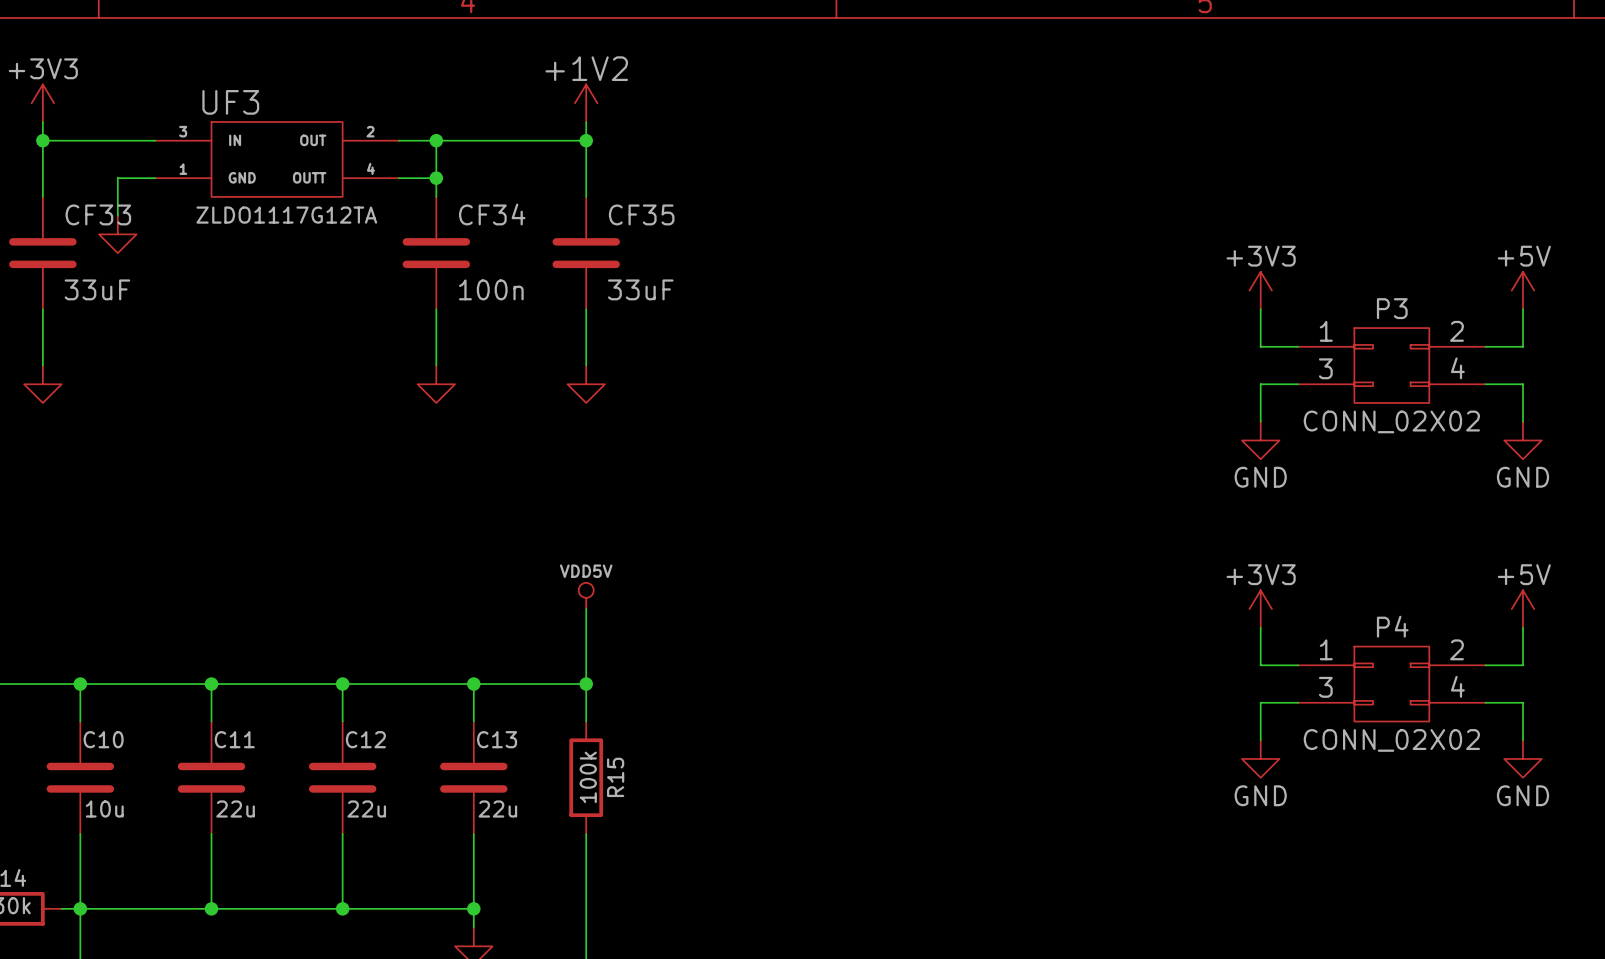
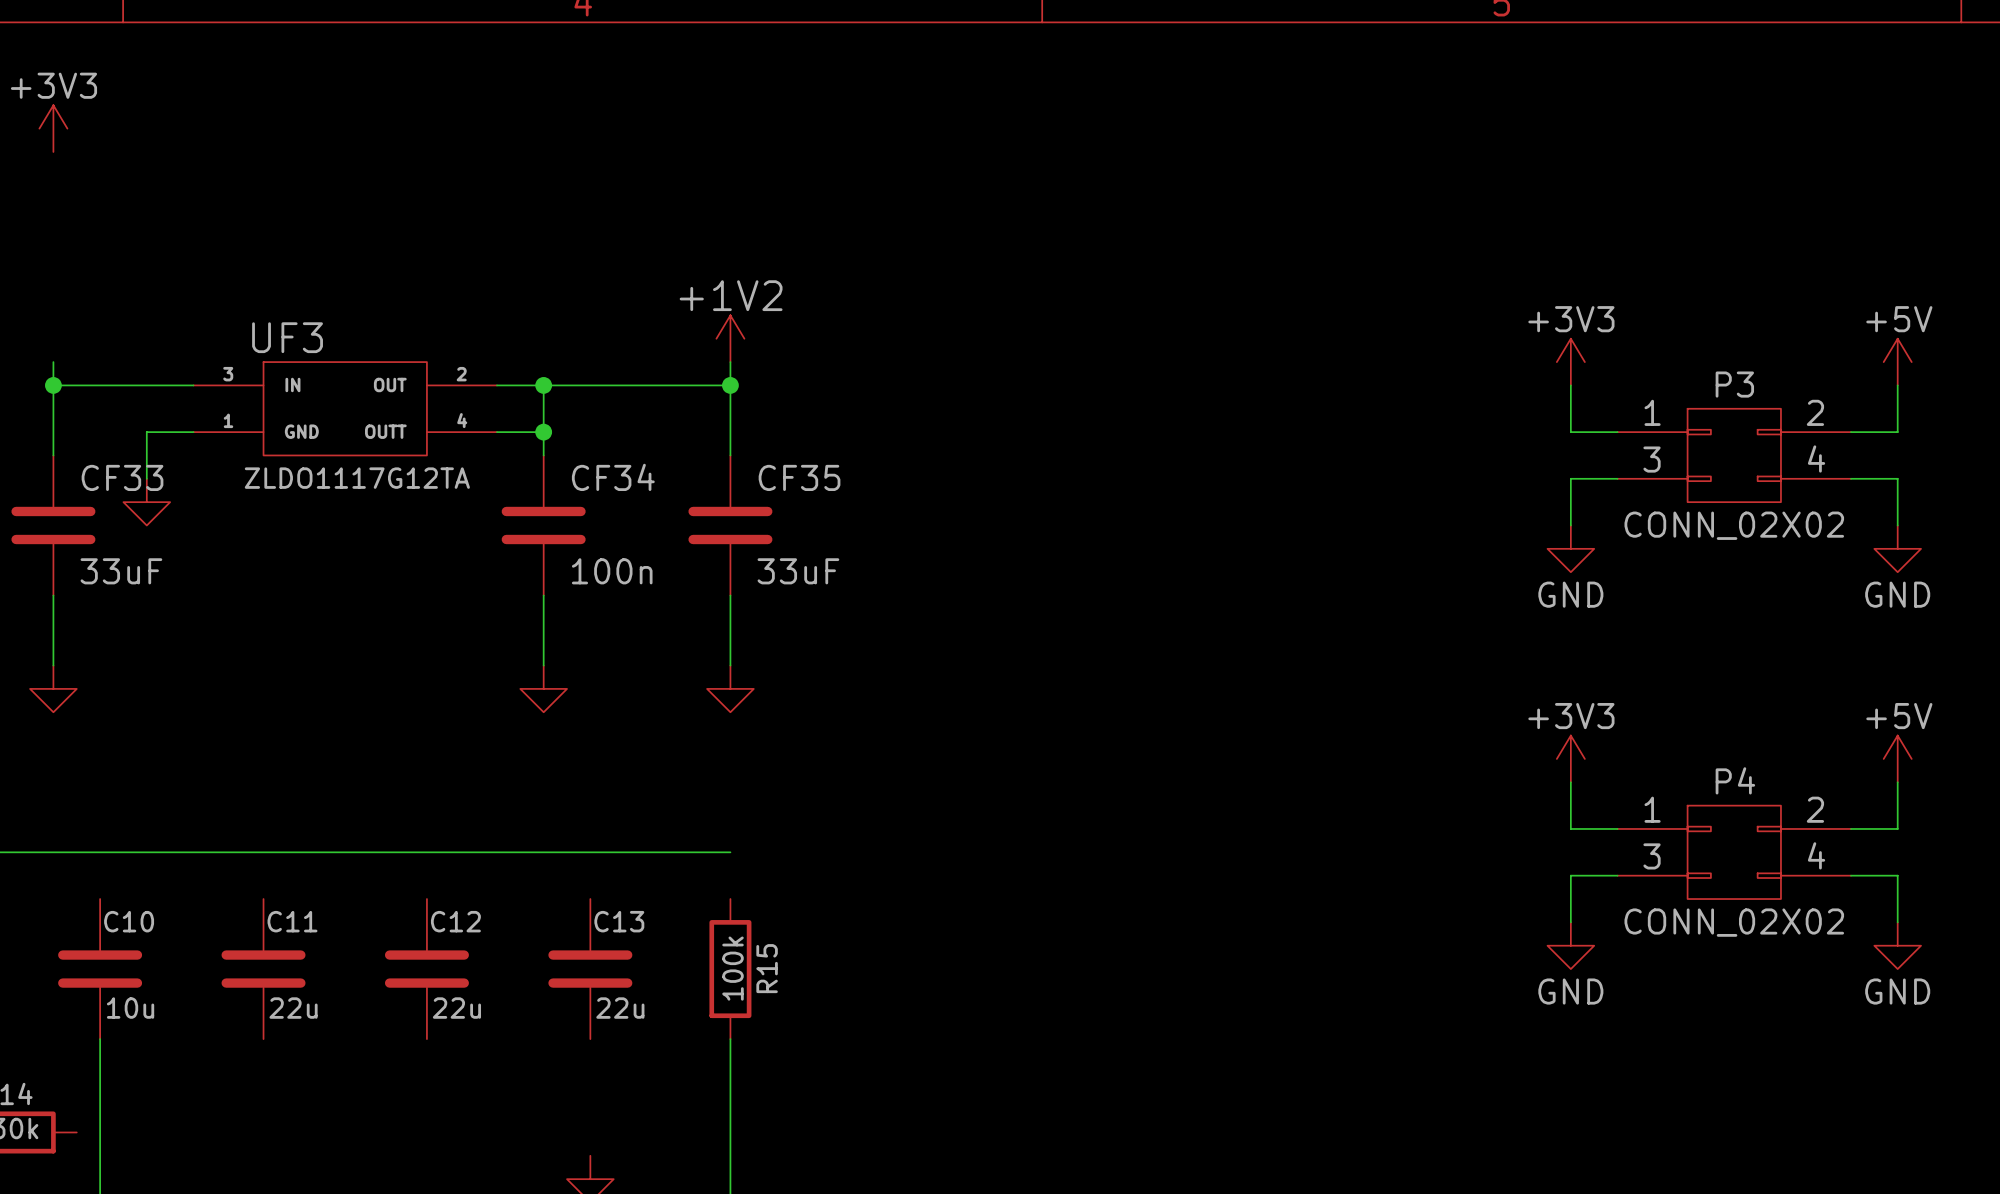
power symbol position: +1V2 (586, 103) -> +1V2 (730, 338)
wire: (42, 121) (42, 196) -> none
wire: (586, 121) (586, 196) -> none
wire: (42, 140) (155, 140) -> none
junction: (42, 140) -> none
wire: (398, 140) (586, 140) -> none
wire: (436, 140) (436, 196) -> (543, 595) (543, 665)
junction: (436, 140) -> none
junction: (586, 140) -> none
UF3 position: (277, 159) -> (345, 408)
wire: (155, 178) (117, 178) (117, 215) -> (193, 432) (146, 432) (146, 478)
wire: (398, 178) (436, 178) -> (496, 432) (543, 432)
junction: (436, 178) -> none
power symbol: (117, 234) -> none
CF33 position: (42, 253) -> (53, 525)
CF34 position: (436, 253) -> (543, 525)
CF35 position: (586, 253) -> (730, 525)
wire: none -> (53, 362) (53, 385) (193, 385)
wire: none -> (730, 362) (730, 385) (496, 385)
junction: none -> (53, 385)
junction: none -> (543, 385)
junction: none -> (730, 385)
junction: none -> (543, 432)
power symbol position: (42, 384) -> (146, 502)
power symbol: (436, 384) -> none
power symbol: (586, 384) -> none
wire: none -> (53, 595) (53, 665)
wire: none -> (730, 595) (730, 665)
power symbol: none -> (53, 688)
power symbol: none -> (543, 688)
power symbol: none -> (730, 688)
power symbol: VDD5V (586, 595) -> none
wire: (586, 609) (586, 721) -> none
wire: (80, 684) (80, 721) -> none
junction: (80, 684) -> none
wire: (211, 684) (211, 721) -> none
junction: (211, 684) -> none
wire: (342, 684) (342, 721) -> none
junction: (342, 684) -> none
wire: (473, 684) (473, 721) -> none
junction: (473, 684) -> none
junction: (586, 684) -> none
wire: (211, 833) (211, 908) -> none
wire: (342, 833) (342, 908) -> none
wire: (473, 833) (473, 927) -> none
wire: (61, 908) (473, 908) -> none
junction: (80, 908) -> none
junction: (211, 908) -> none
junction: (342, 908) -> none
junction: (473, 908) -> none

